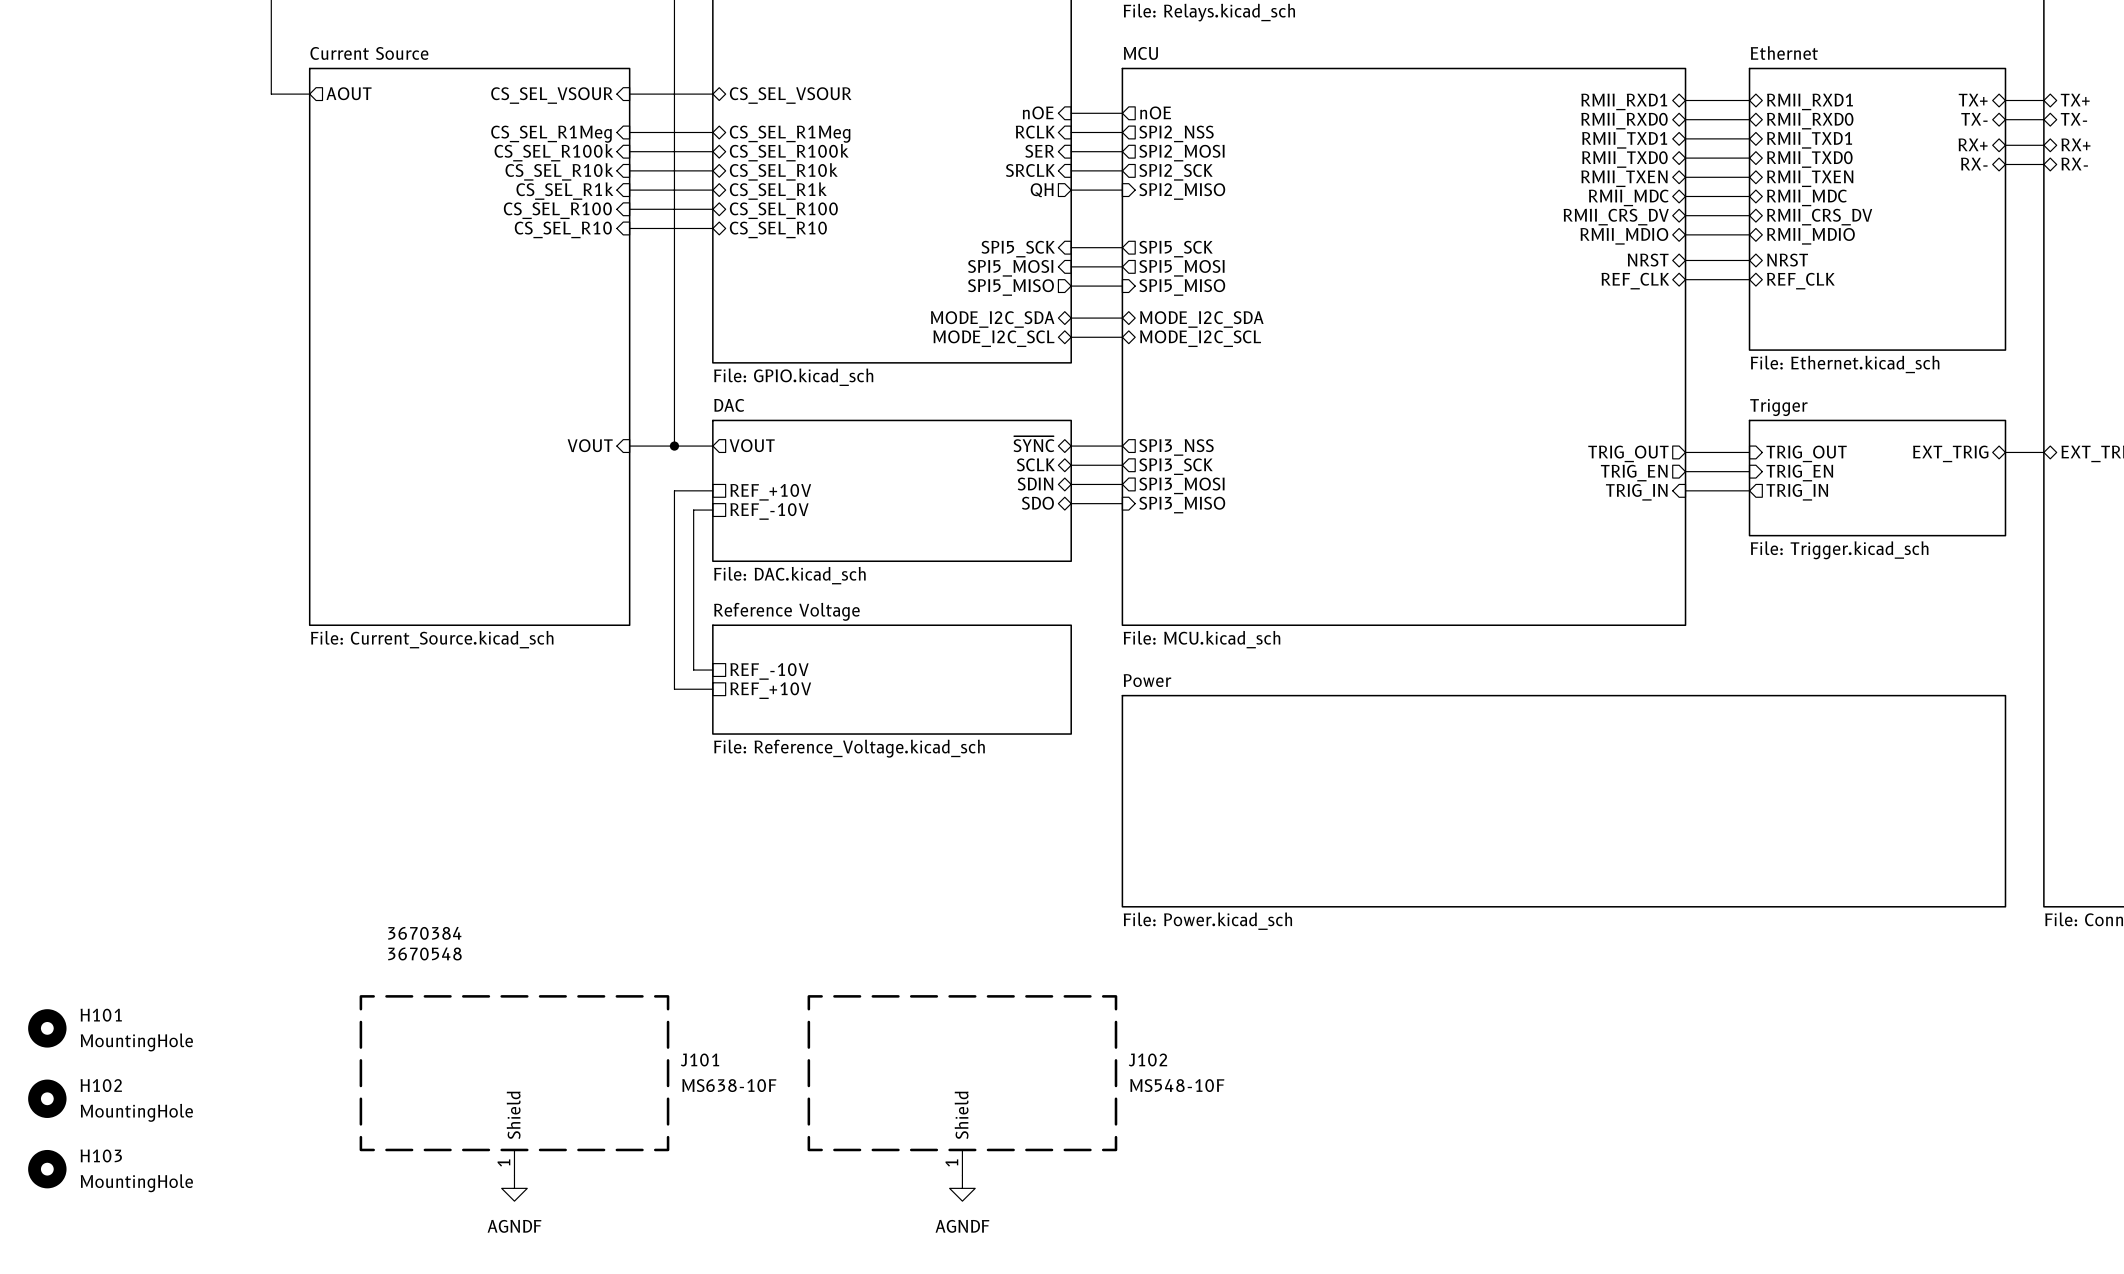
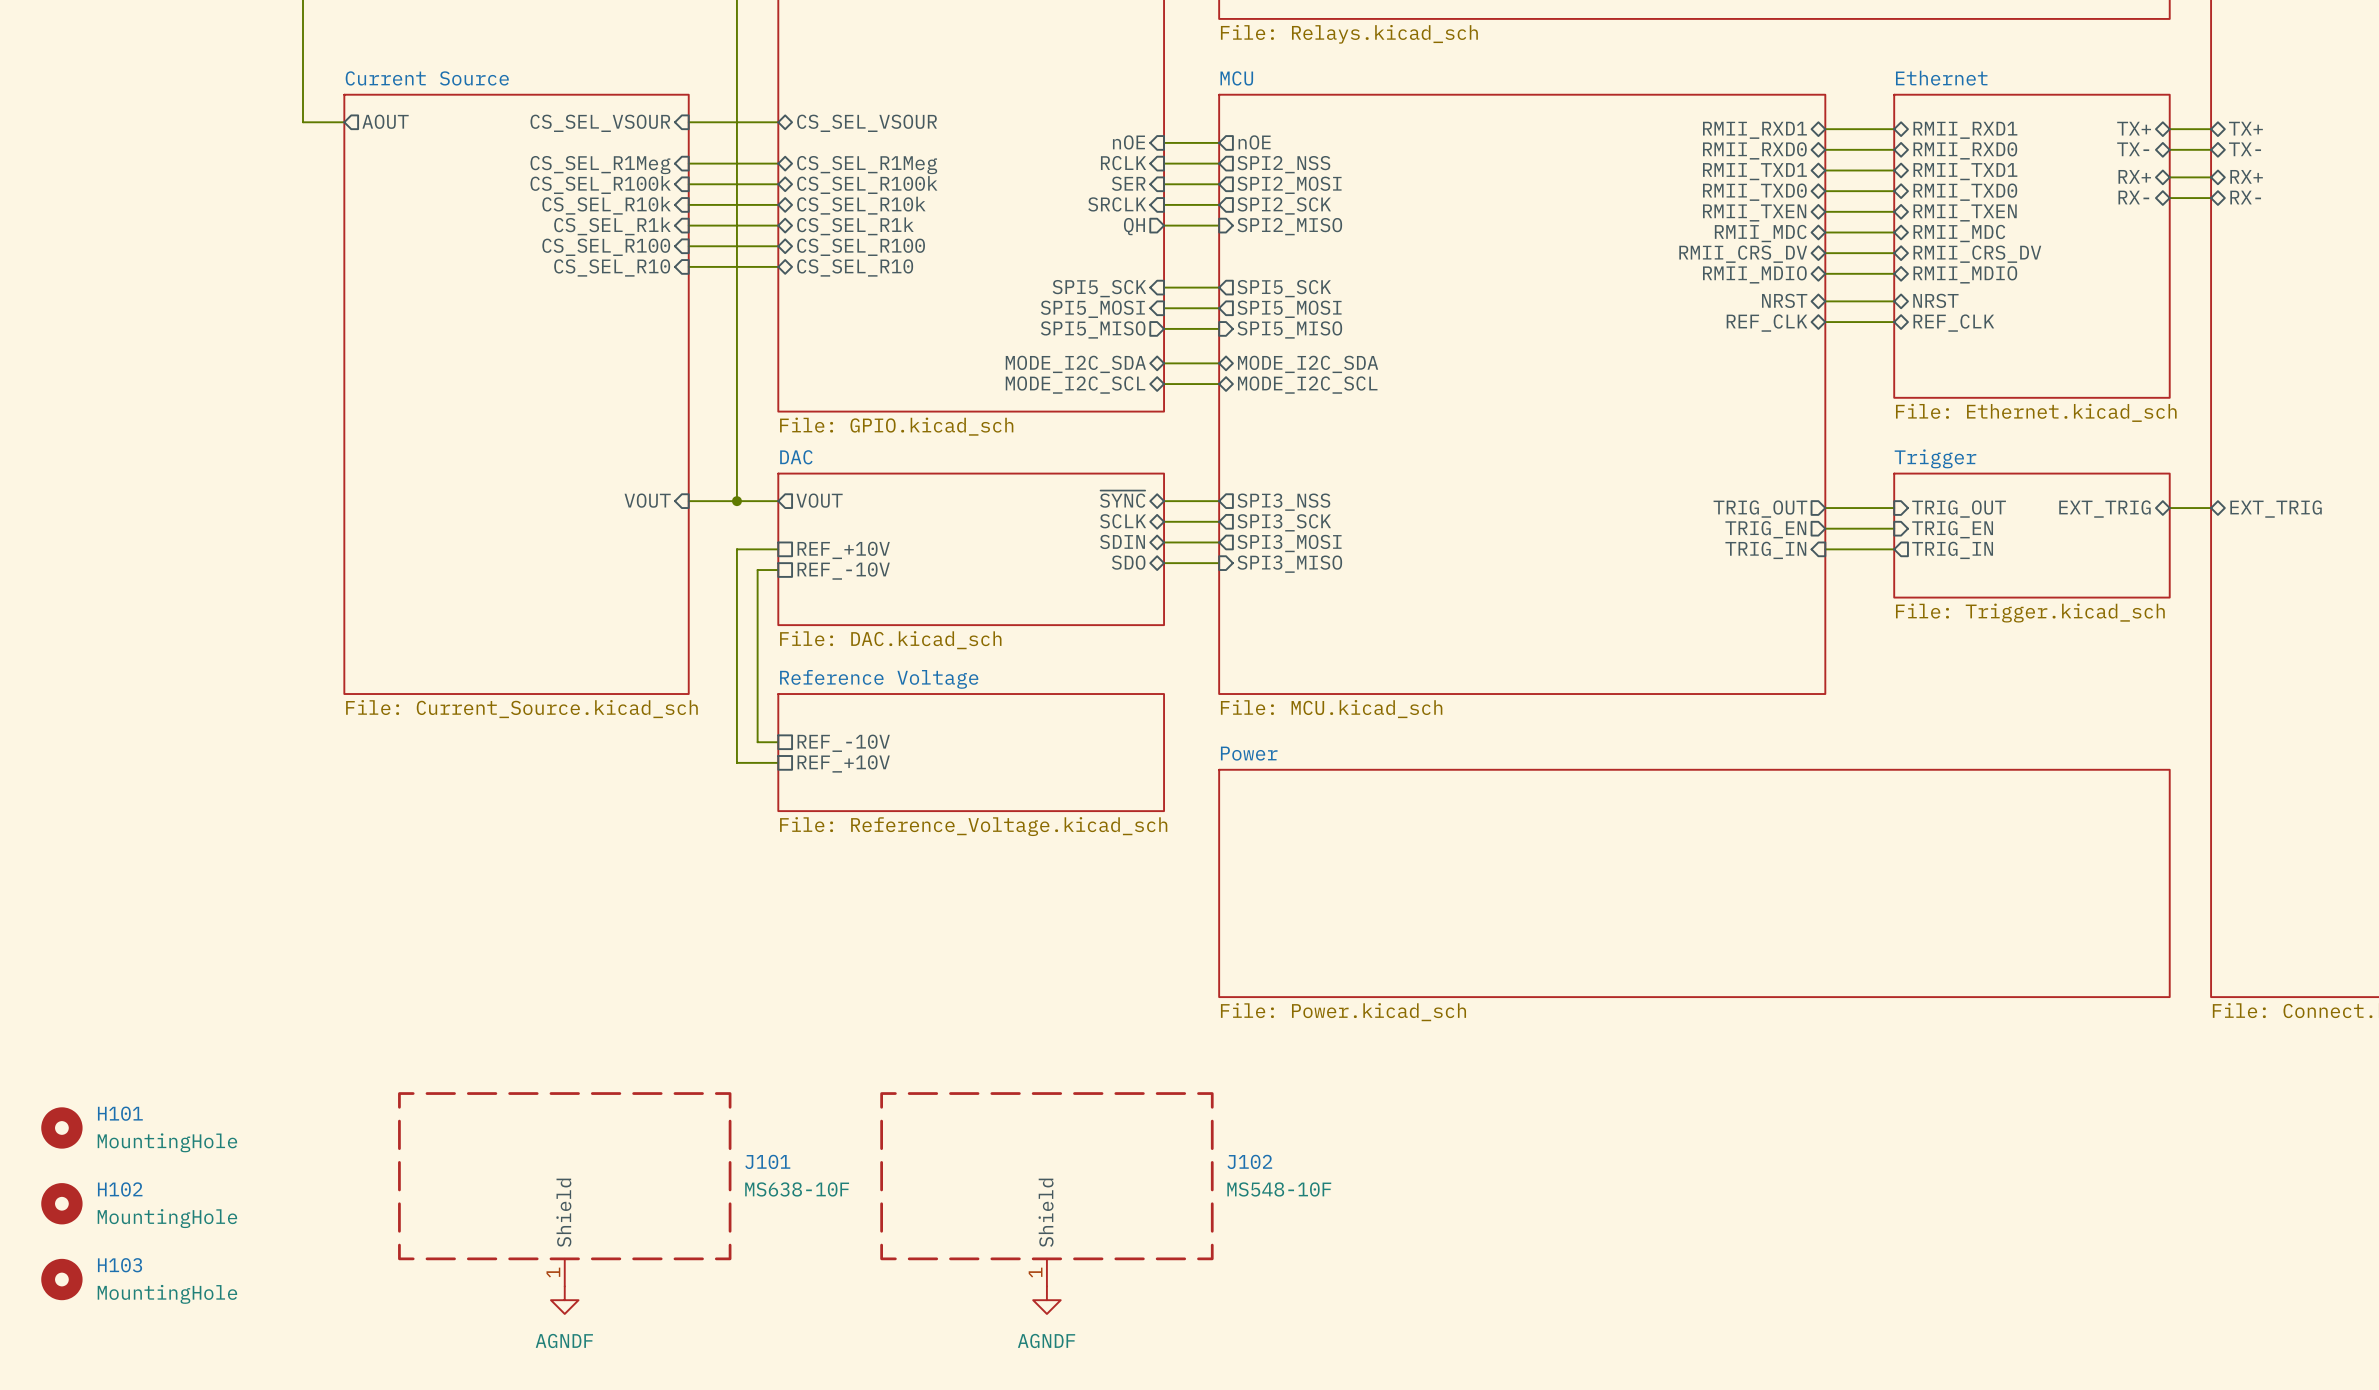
text: 3670384 (424, 933) -> none
text: 3670548 (424, 953) -> none

